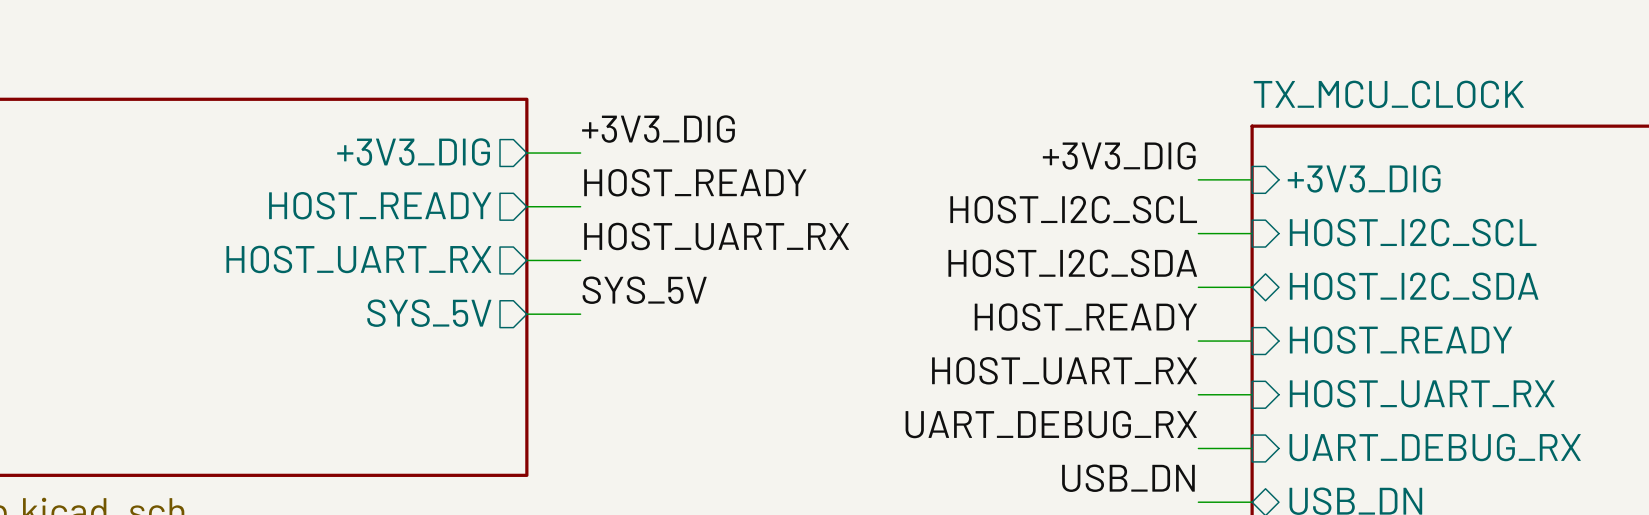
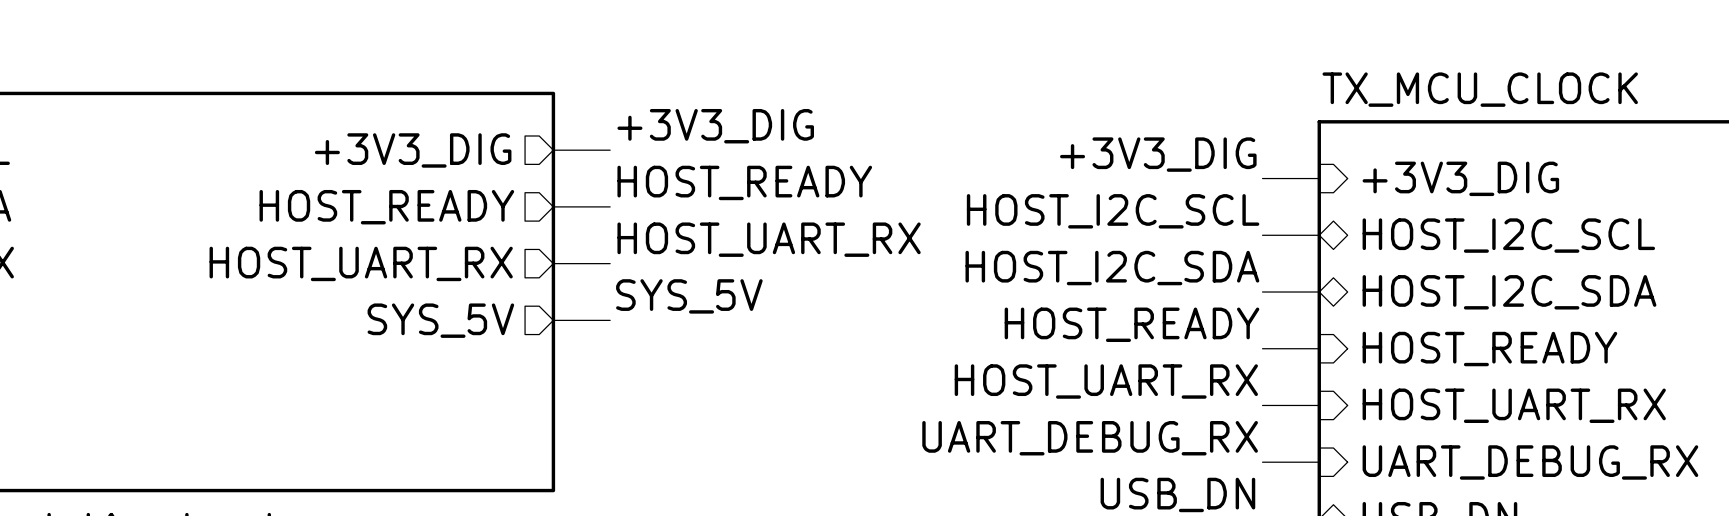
sheet pin shape: input (1413, 232) -> bidirectional (1508, 235)

